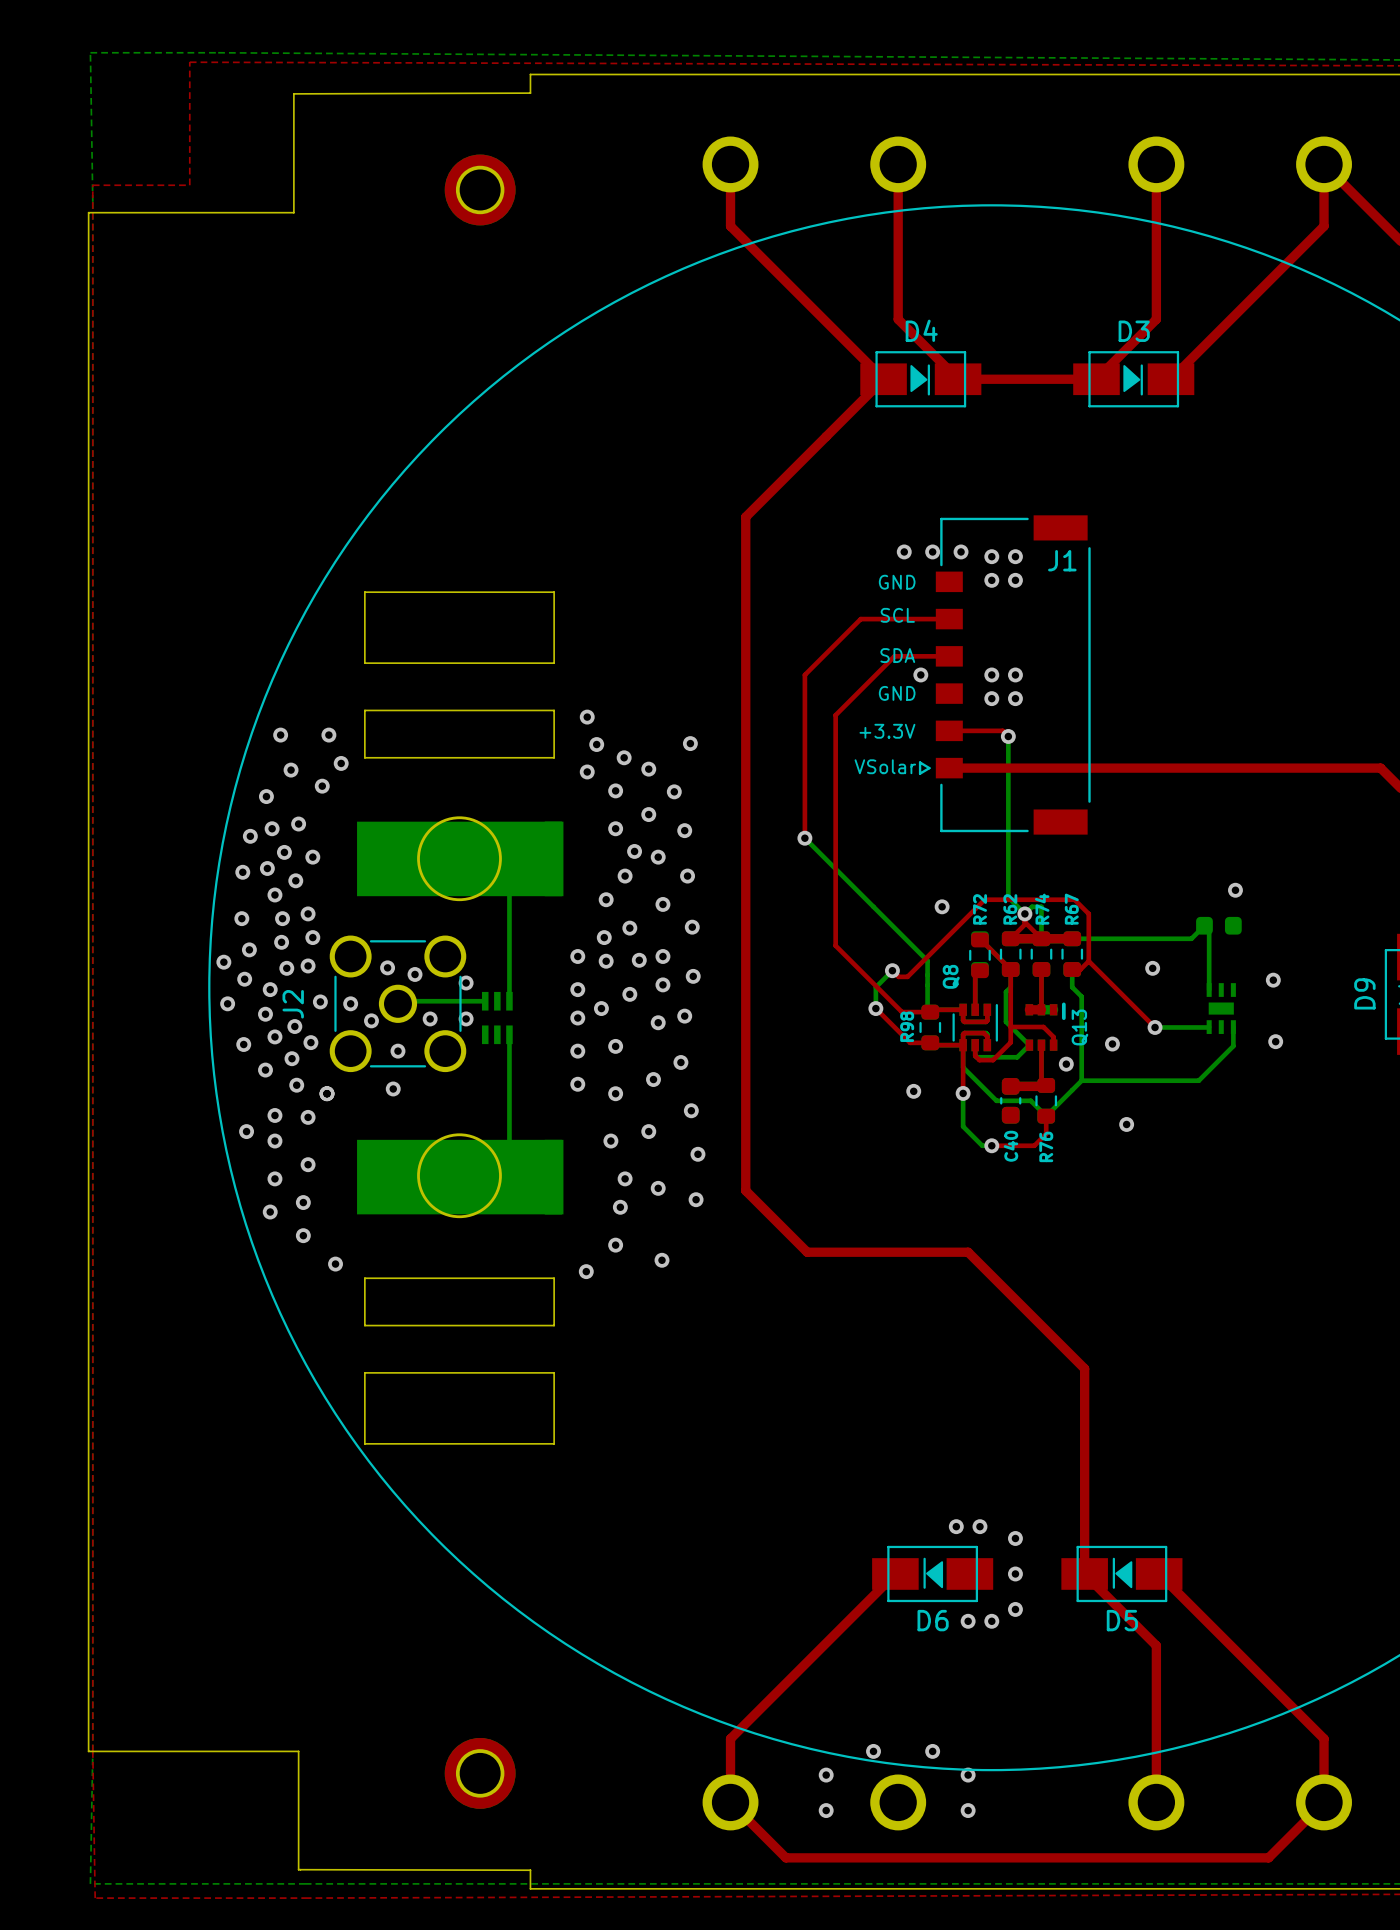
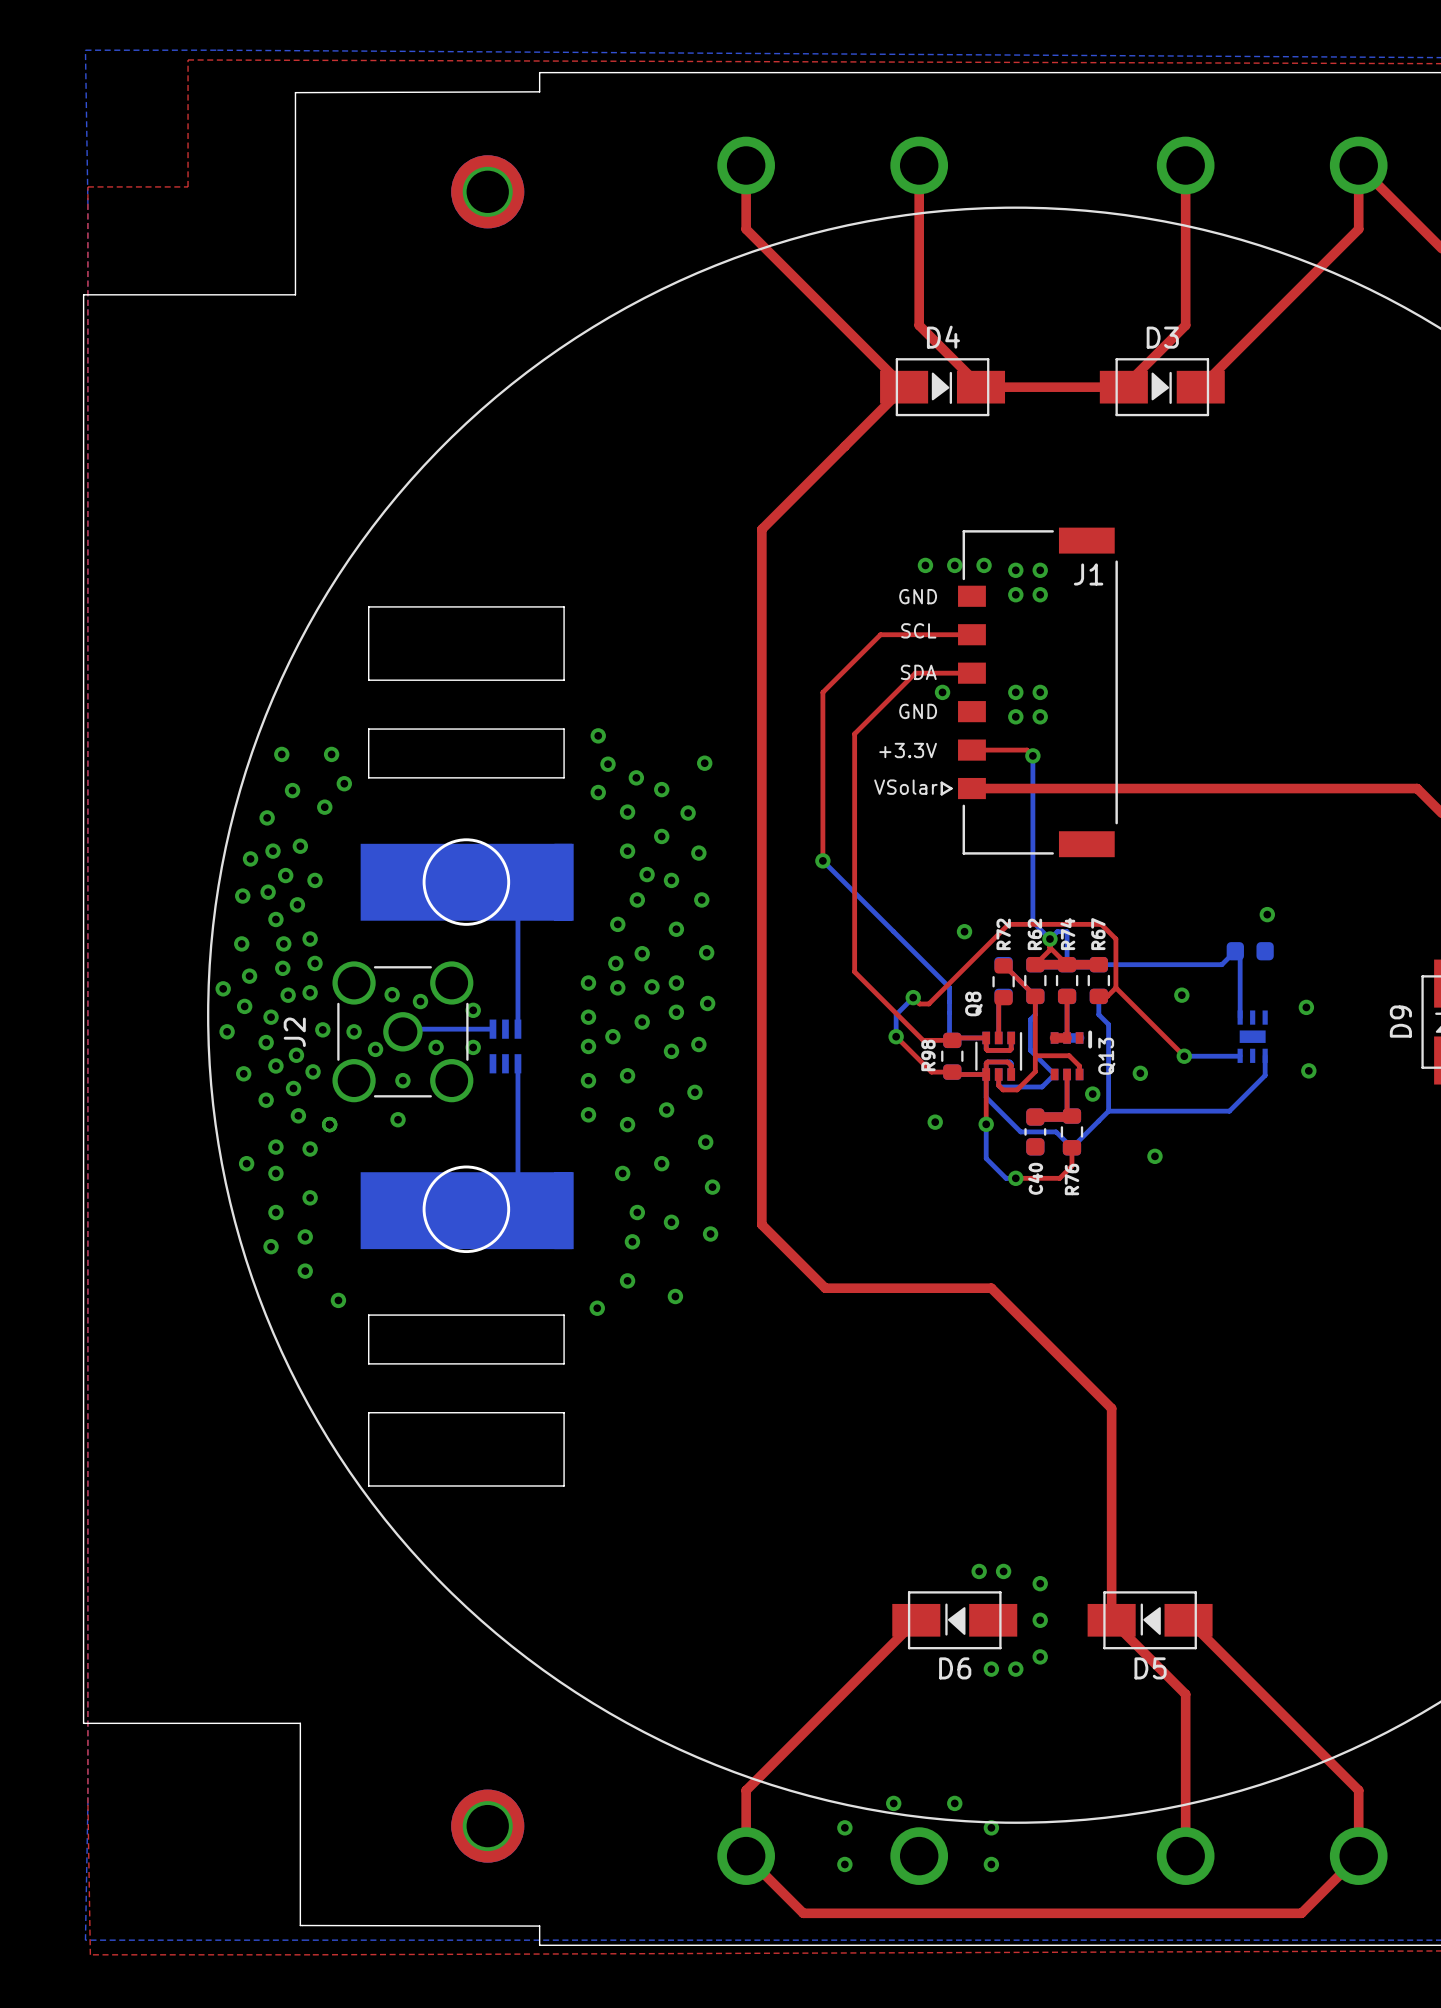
board edge: (293, 212) (88, 212) (88, 289) -> (295, 215) (295, 294) (83, 294)
board edge: (88, 1673) (88, 1751) (298, 1751) -> (83, 1723) (300, 1723) (300, 1803)

